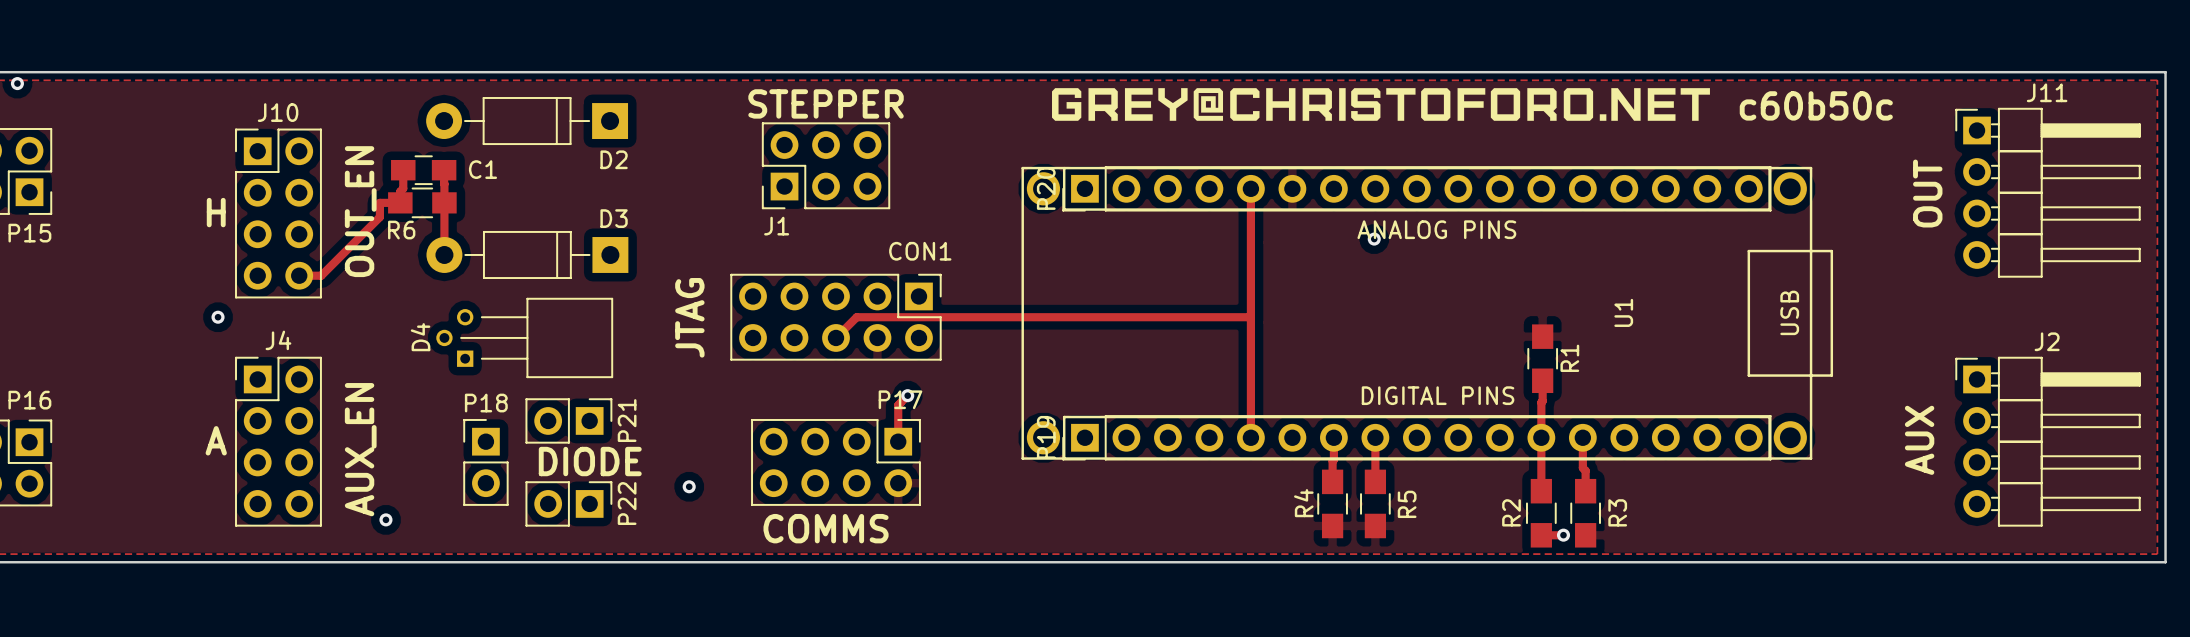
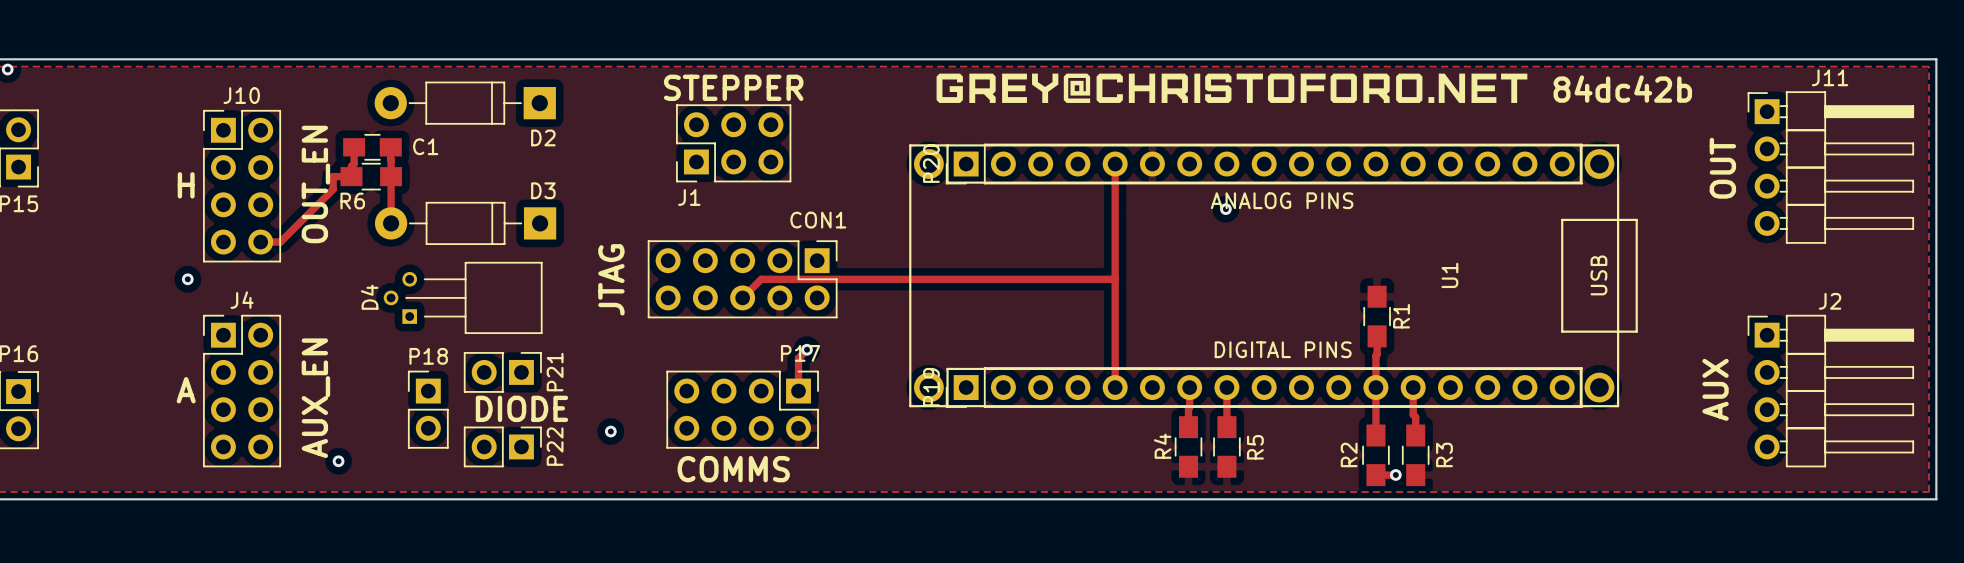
text: c60b50c (1816, 105) -> 84dc42b (1622, 89)

